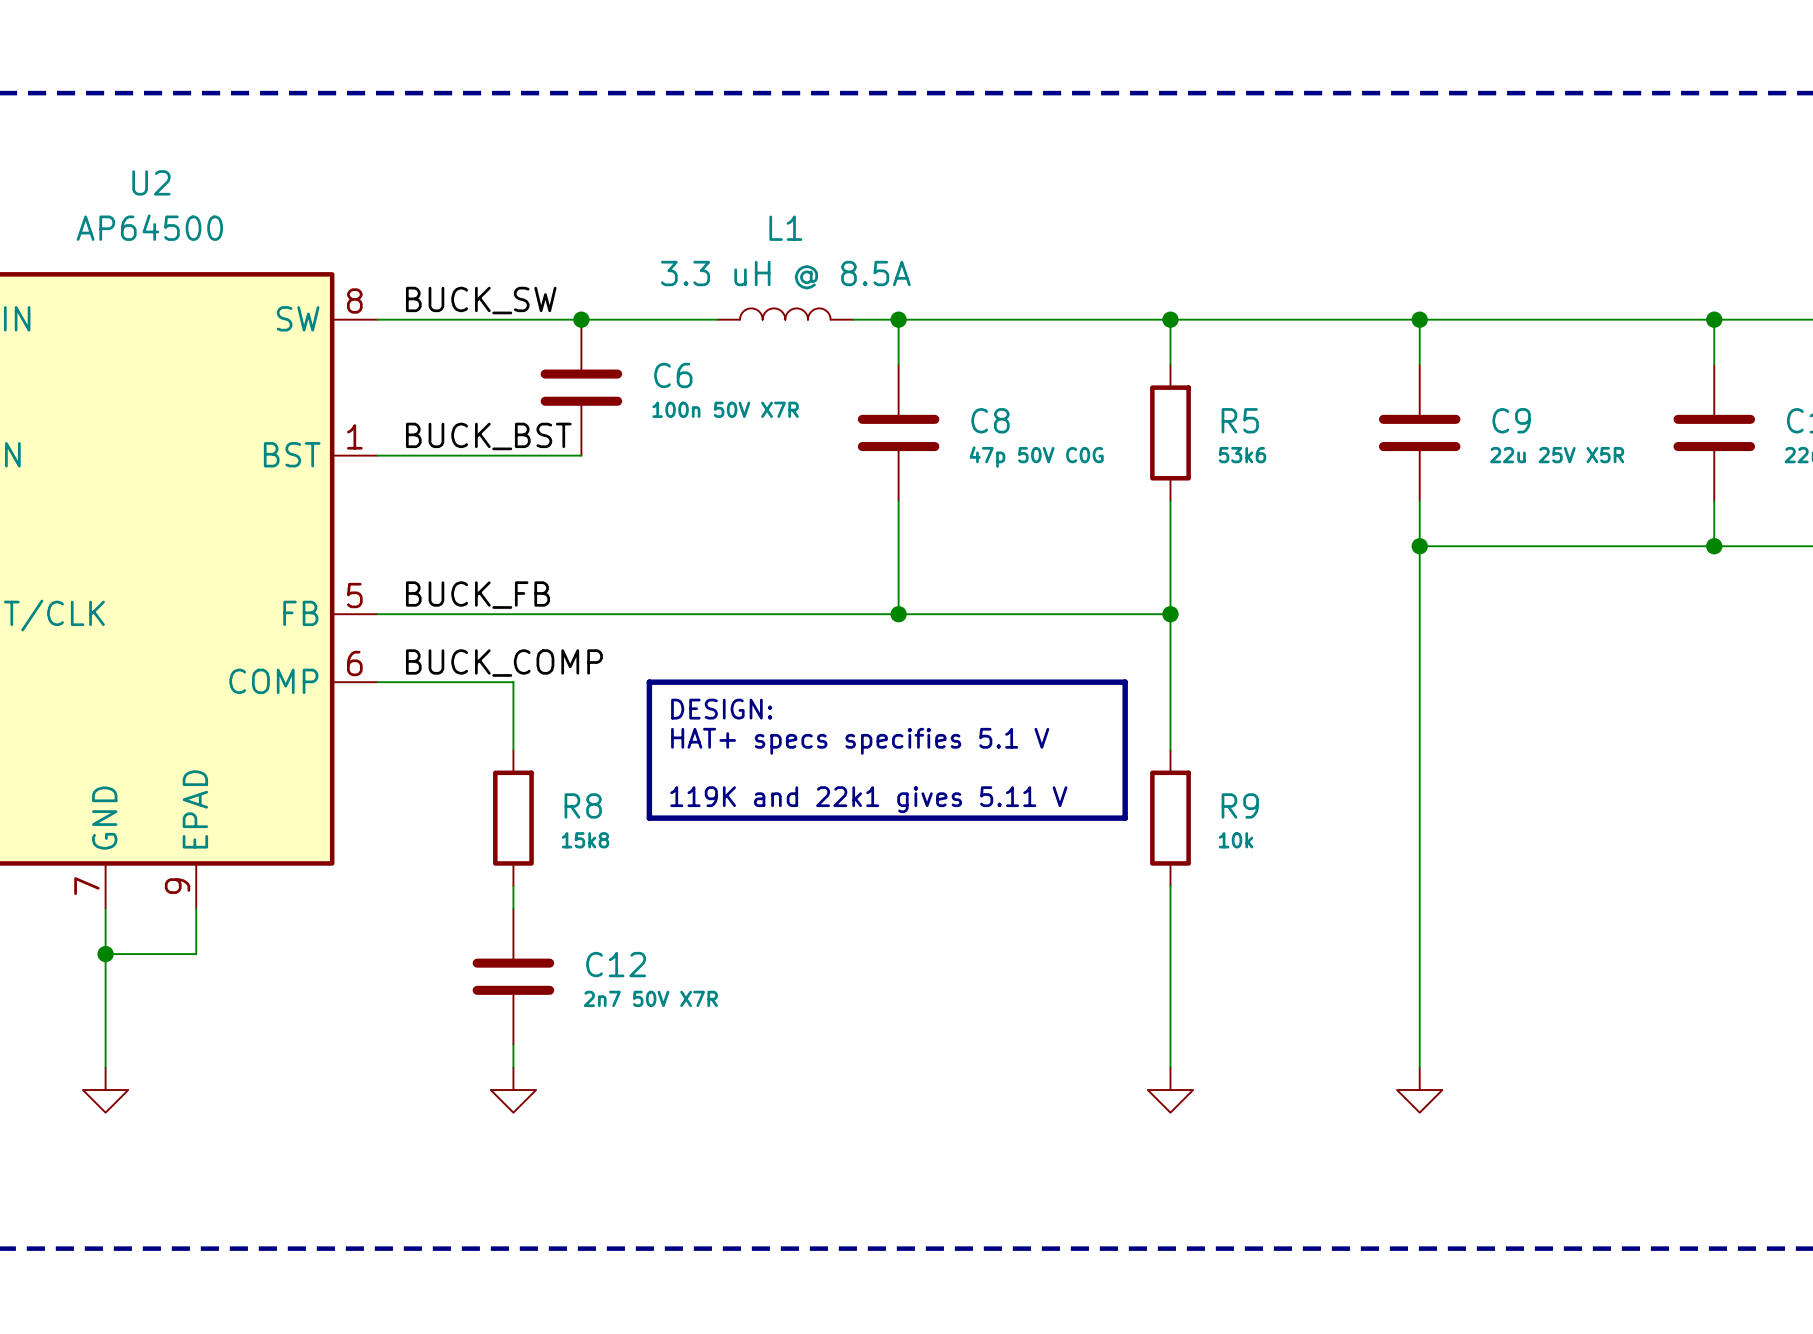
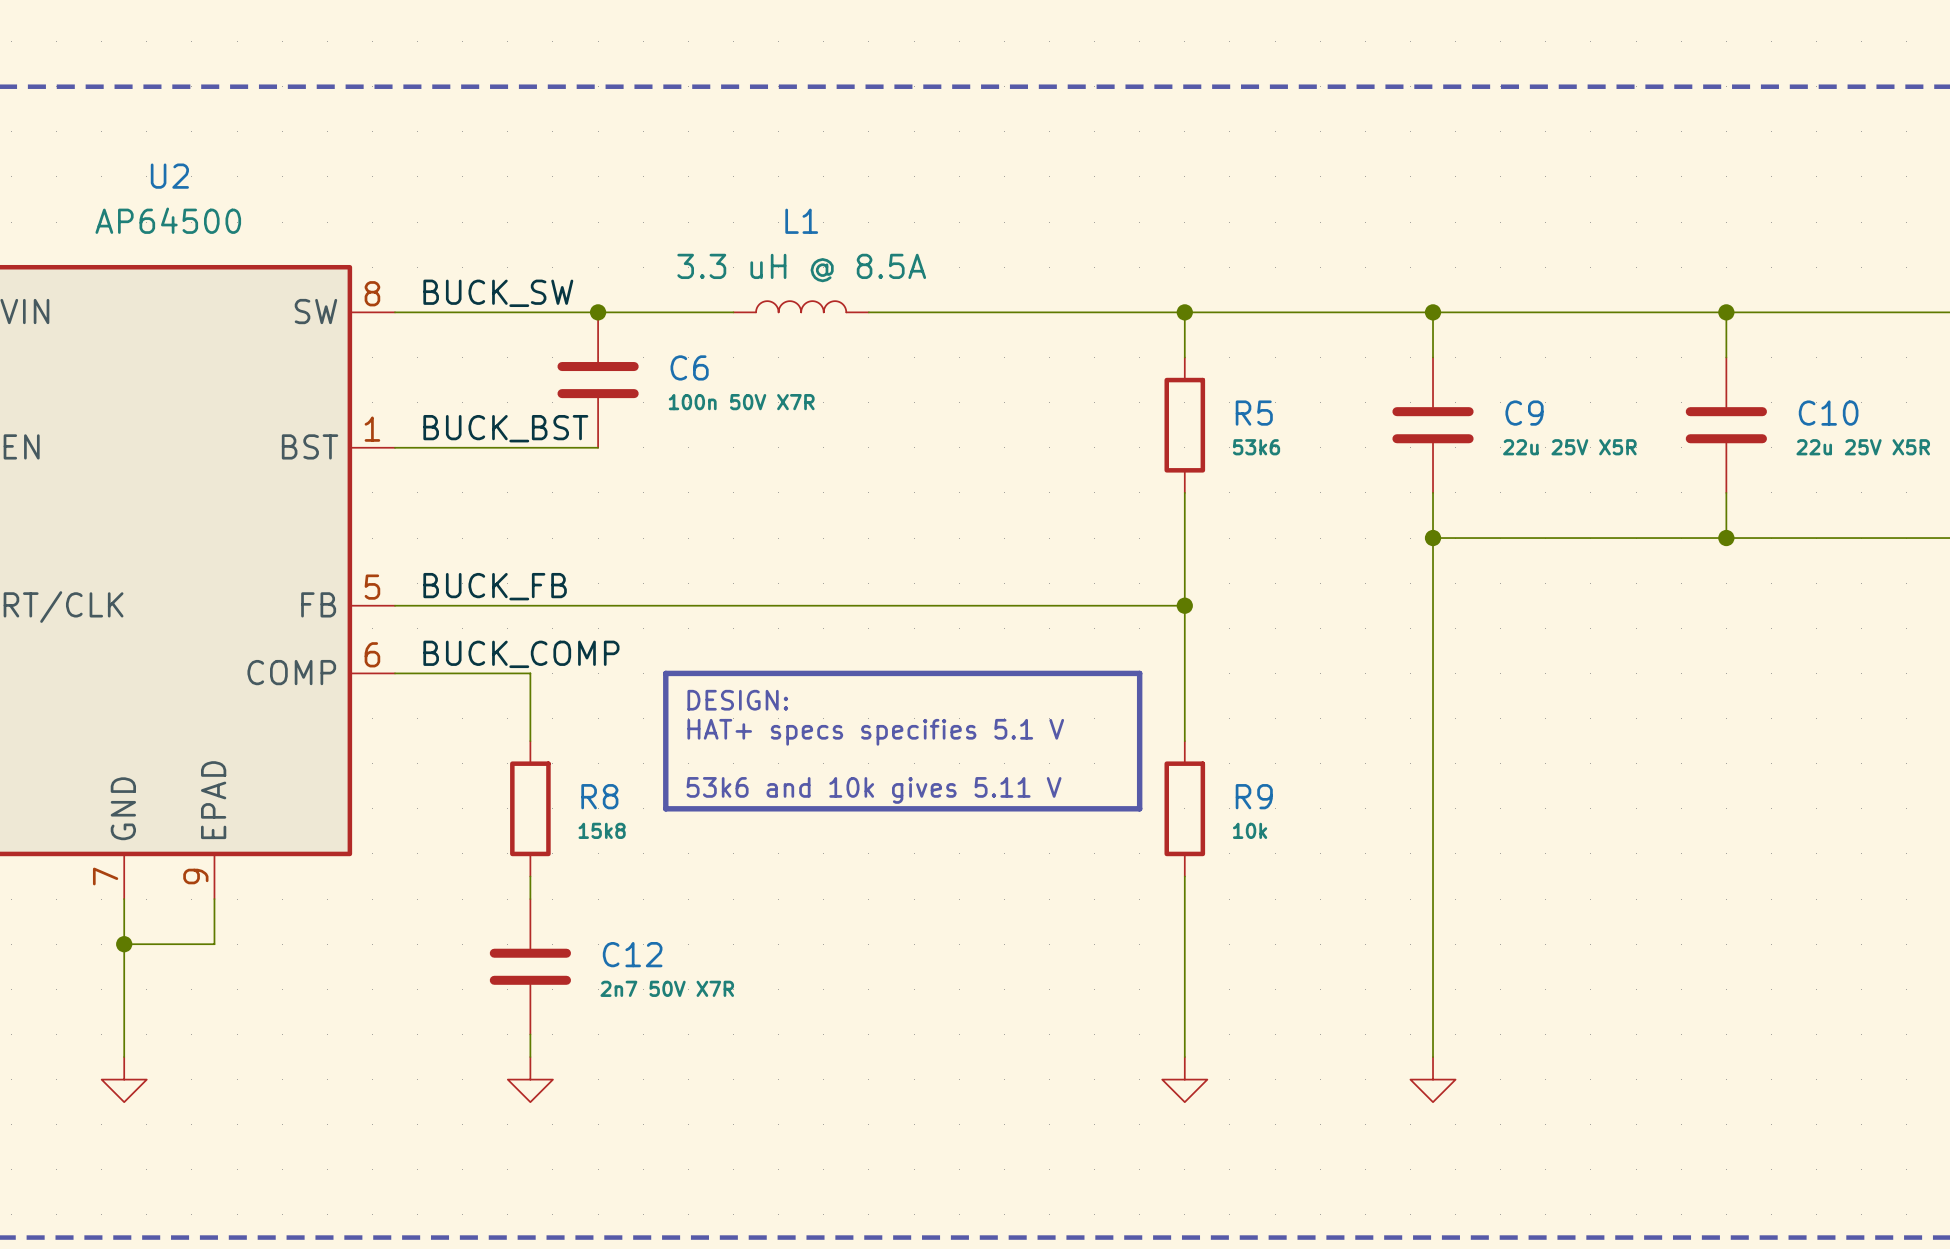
wire: (898, 319) (898, 364) -> none
junction: (898, 319) -> none
C8: 47p 50V C0G (898, 432) -> none
wire: (898, 500) (898, 614) -> none
junction: (898, 614) -> none
text: 119K and 22k1 gives 5.11 V (868, 799) -> 53k6 and 10k gives 5.11 V (874, 790)

